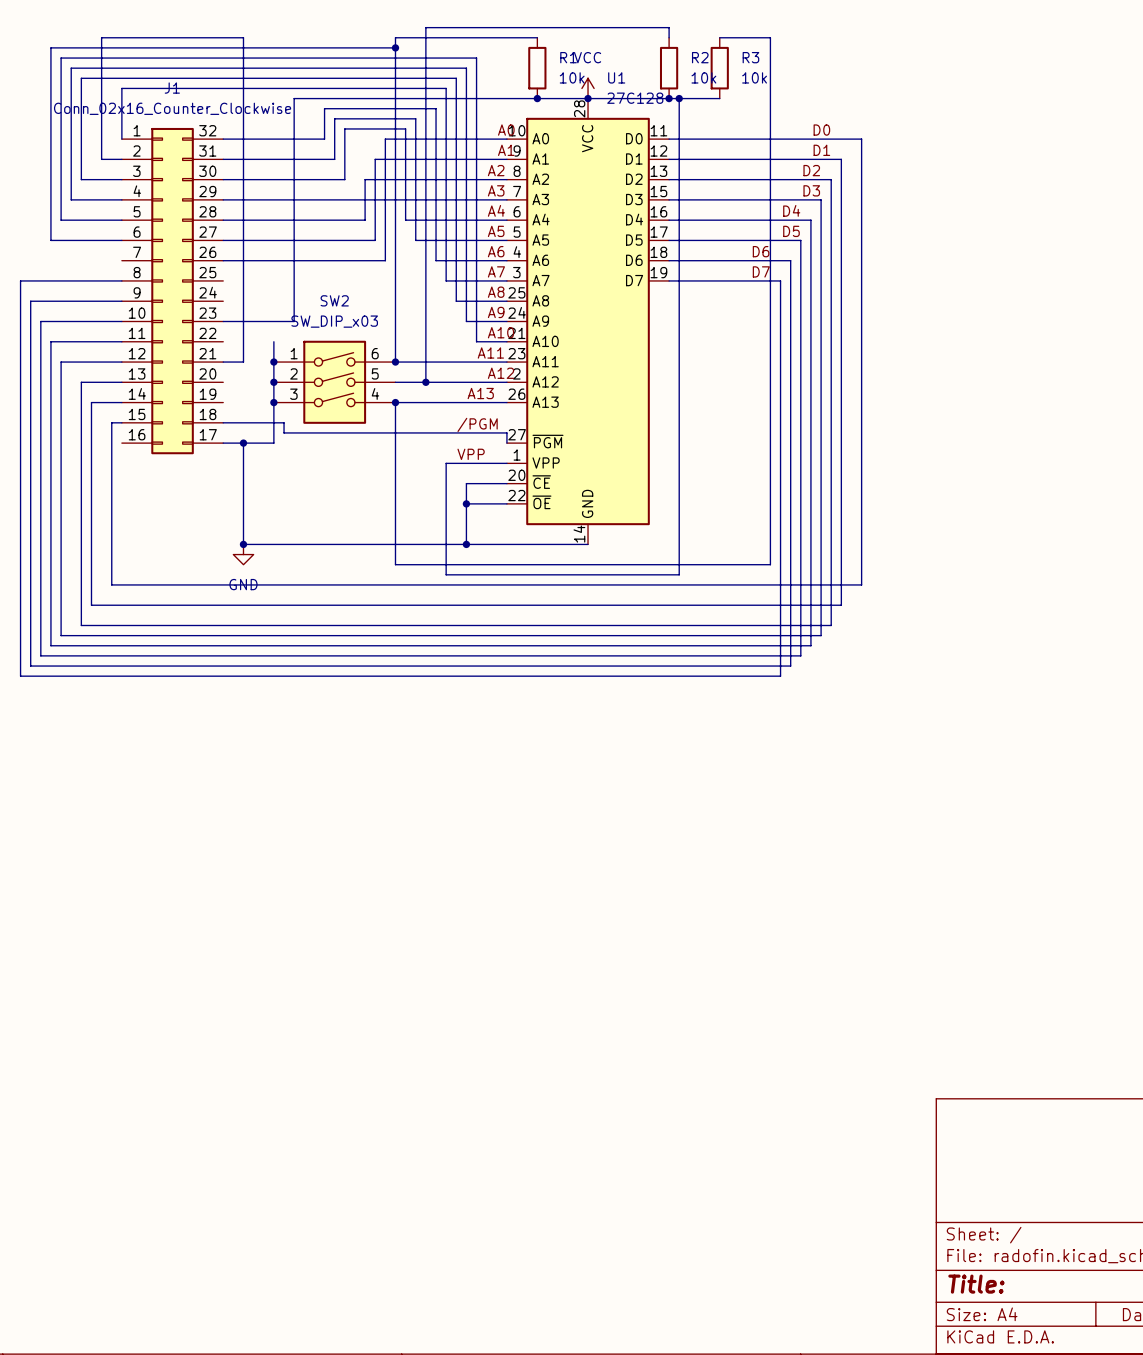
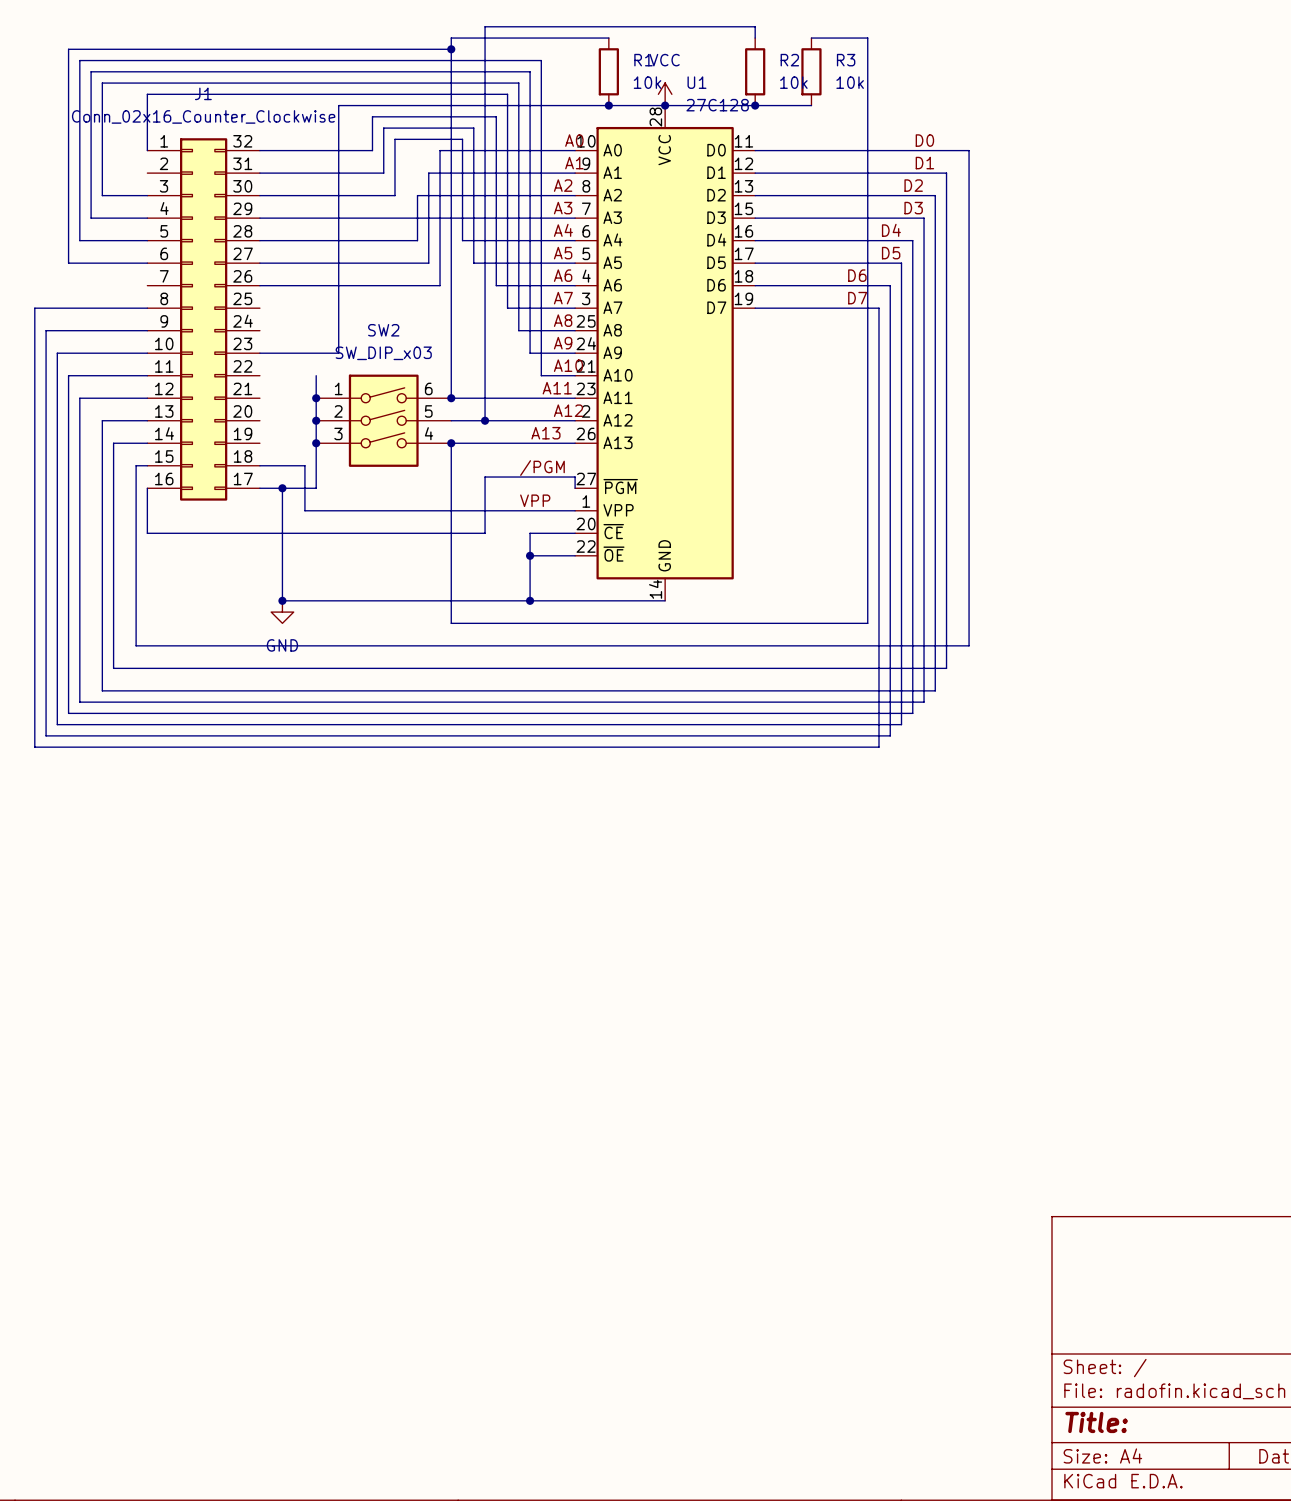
wire: (679, 98) (679, 574) (446, 574) (446, 463) -> none
junction: (679, 98) -> none
wire: (121, 159) (101, 159) (101, 37) (243, 37) (243, 362) (223, 362) -> none
wire: (263, 422) (284, 422) (284, 432) (425, 432) -> (304, 465) (304, 510) (507, 510)
wire: none -> (485, 477) (485, 533) (147, 533) (147, 488)

